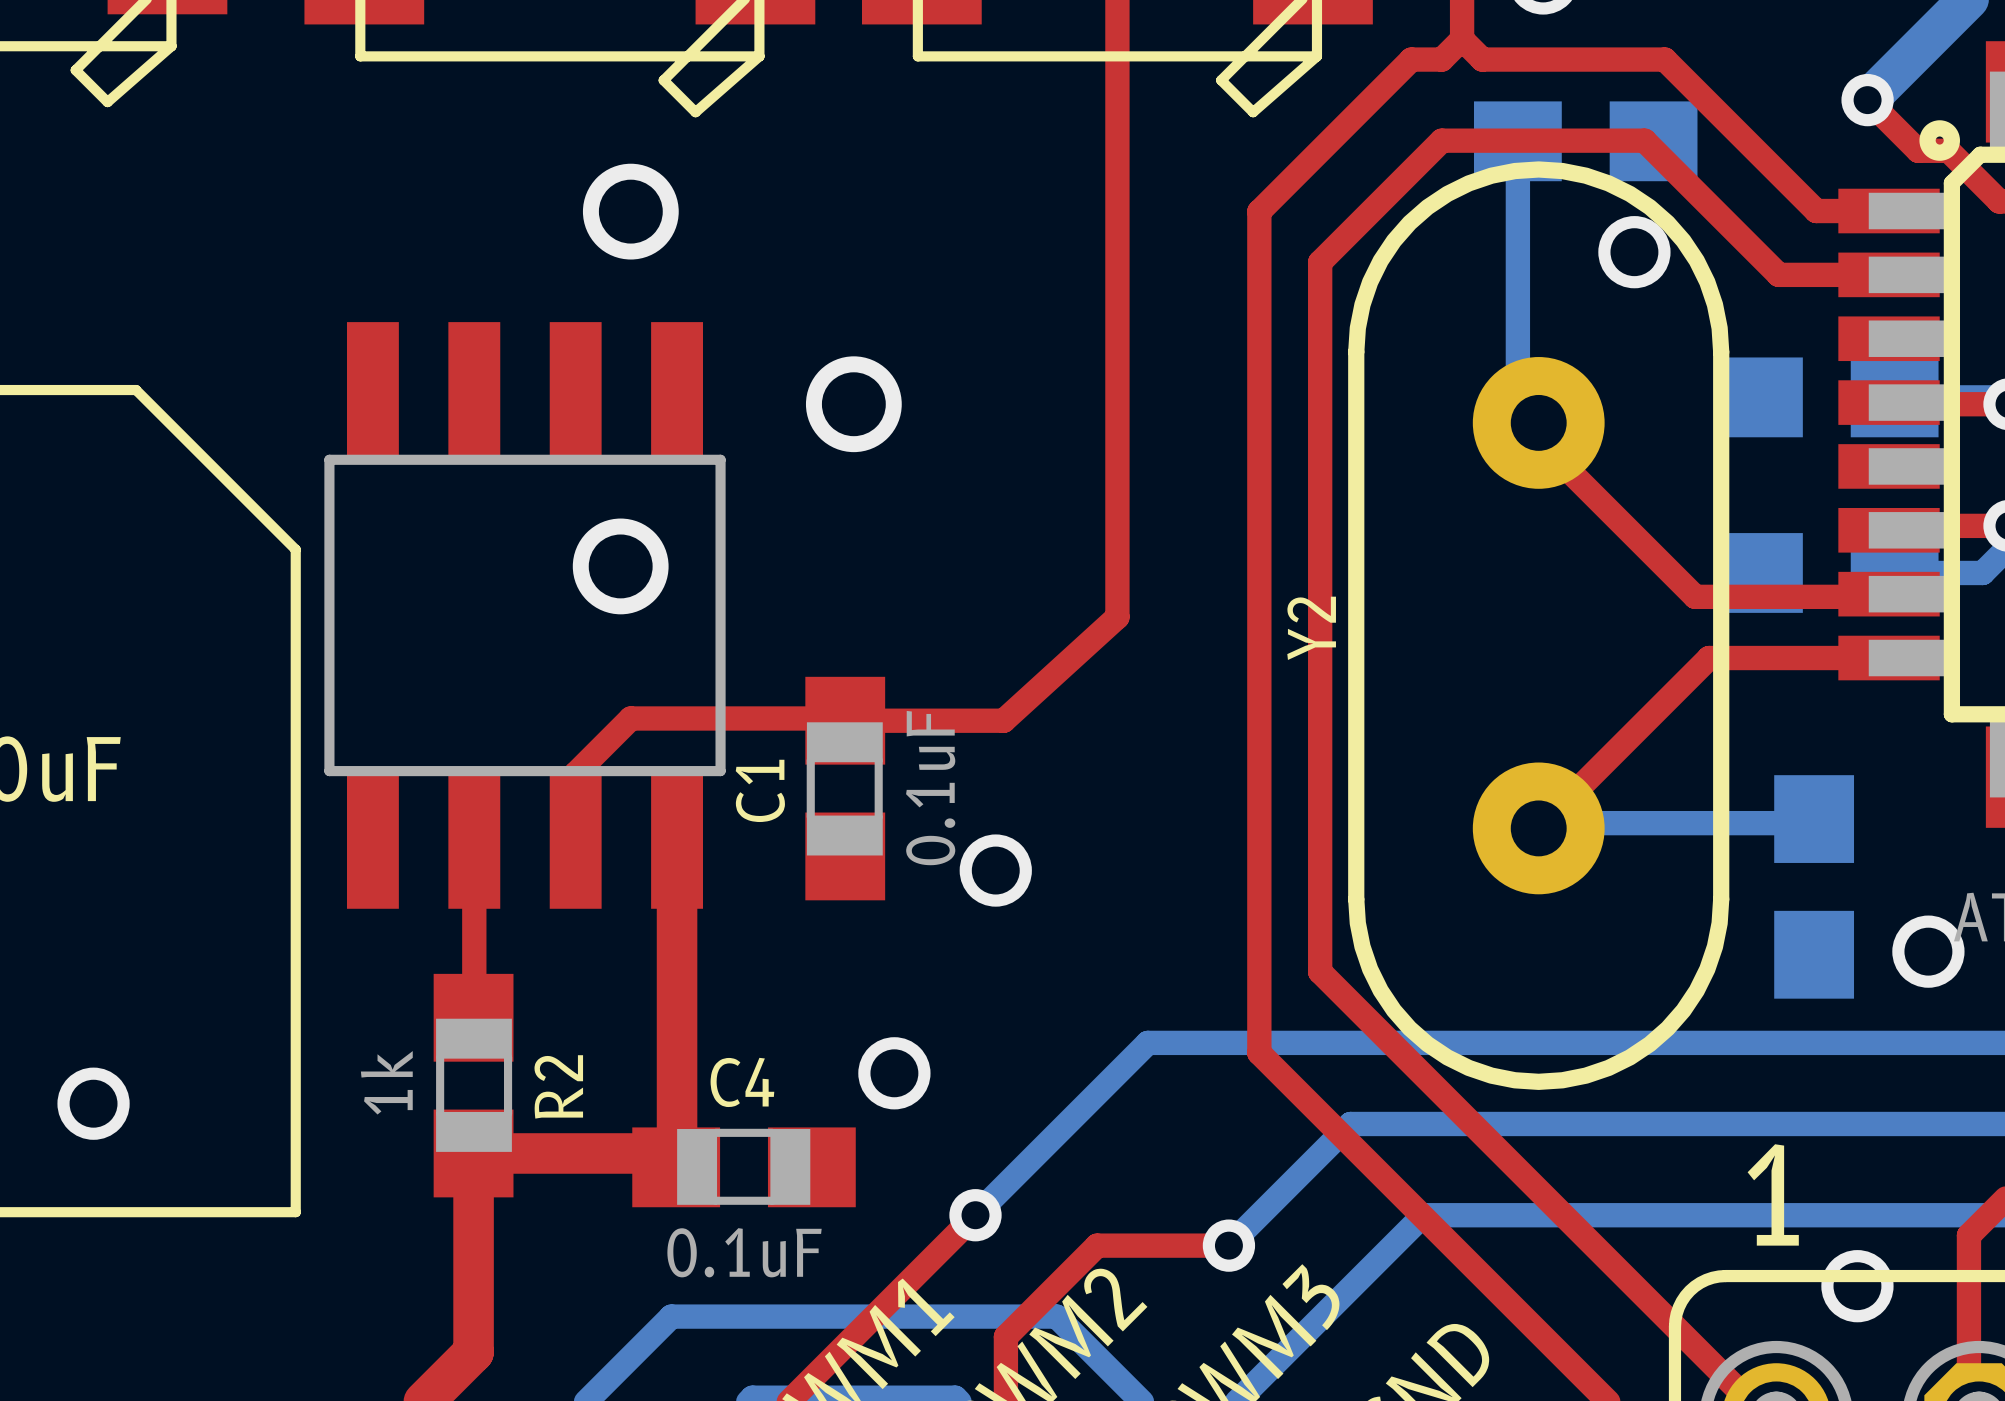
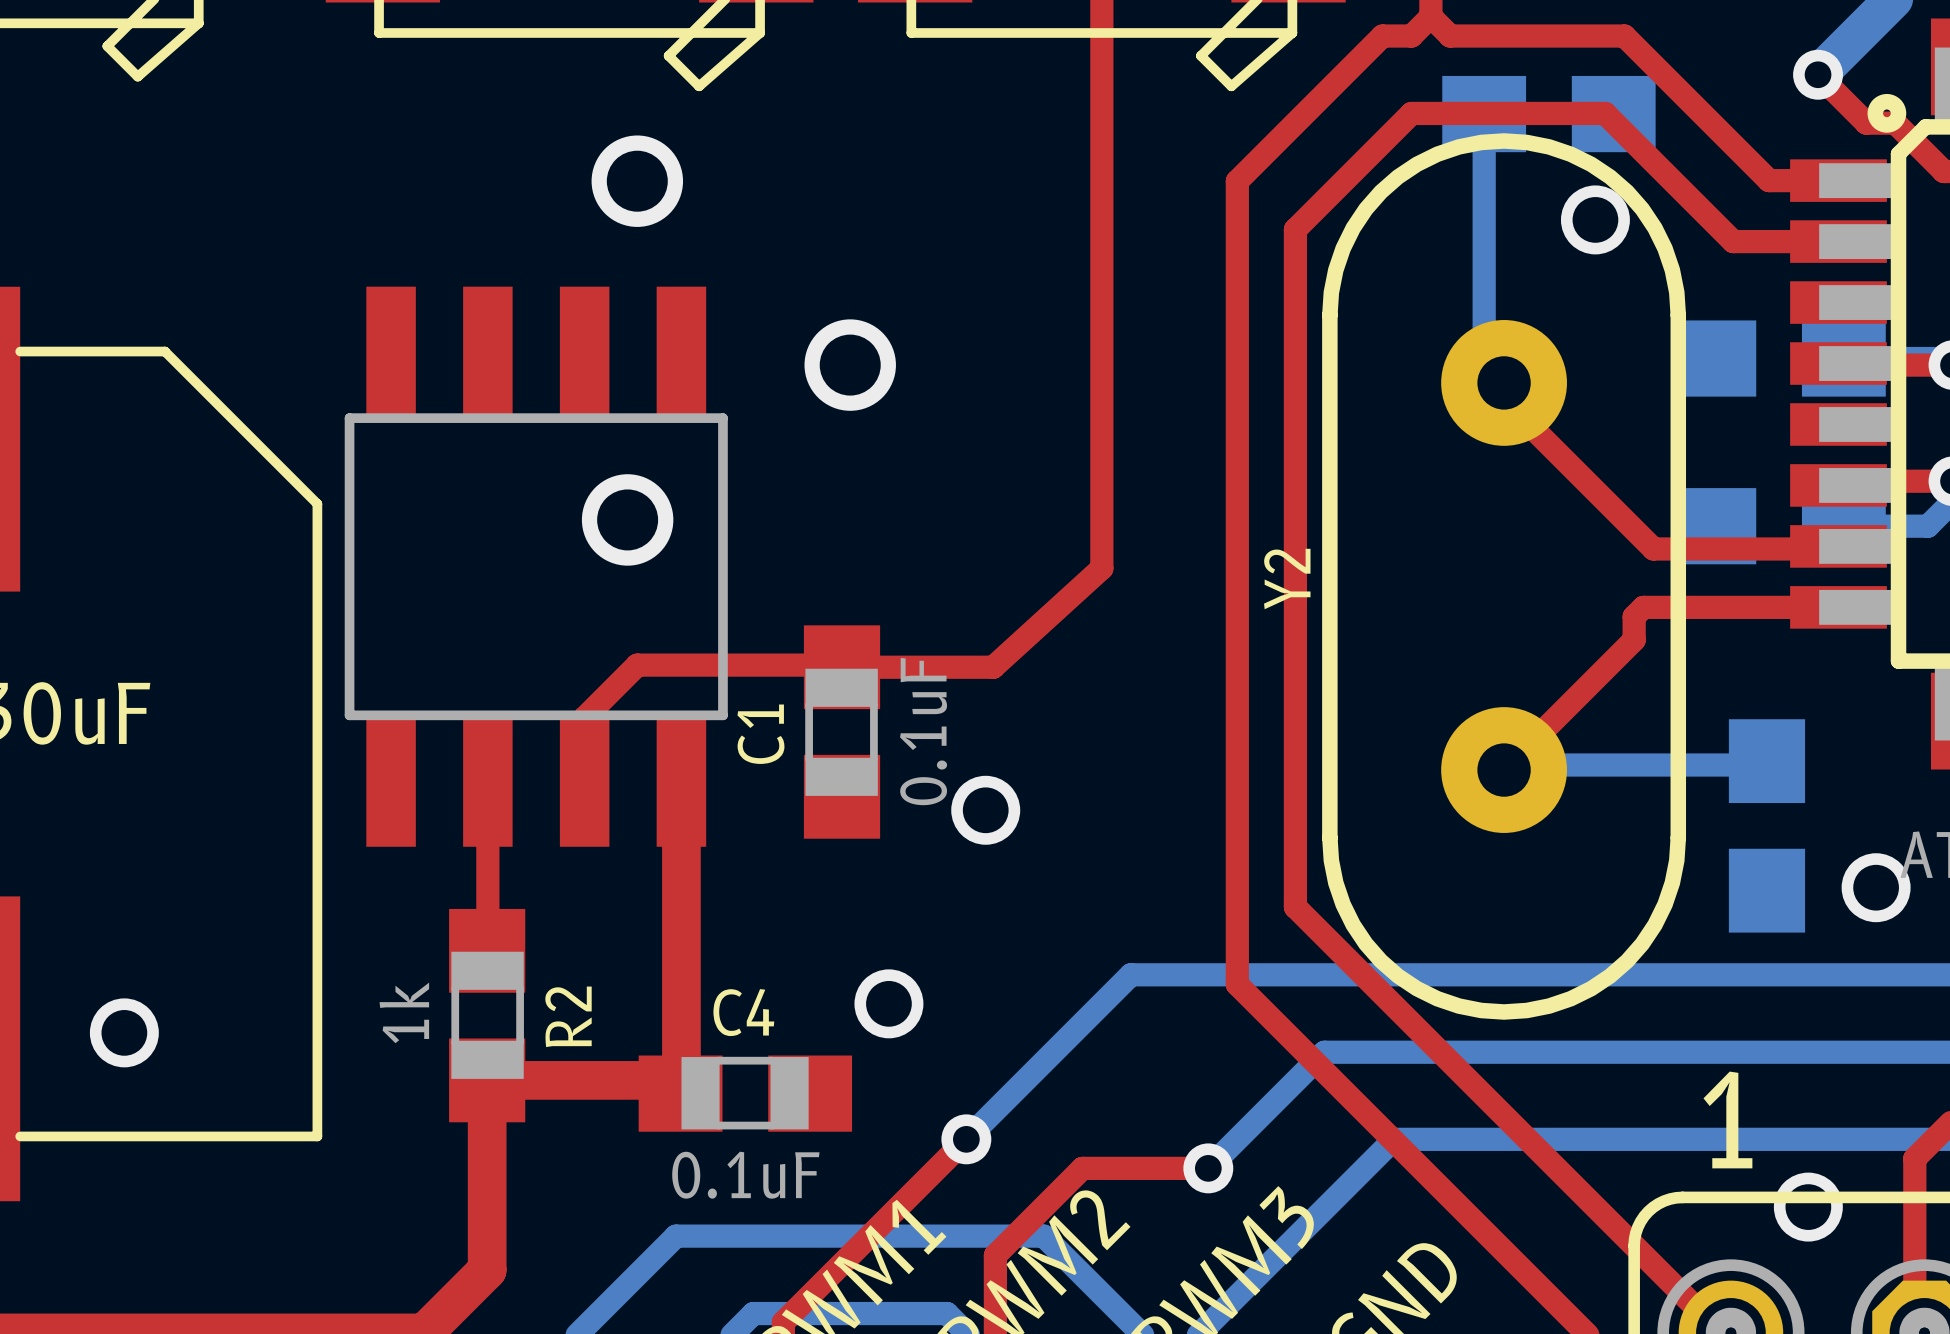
top track: (1709, 658) (1674, 692) -> (1666, 607) (1643, 607) (1634, 616) (1634, 639)

